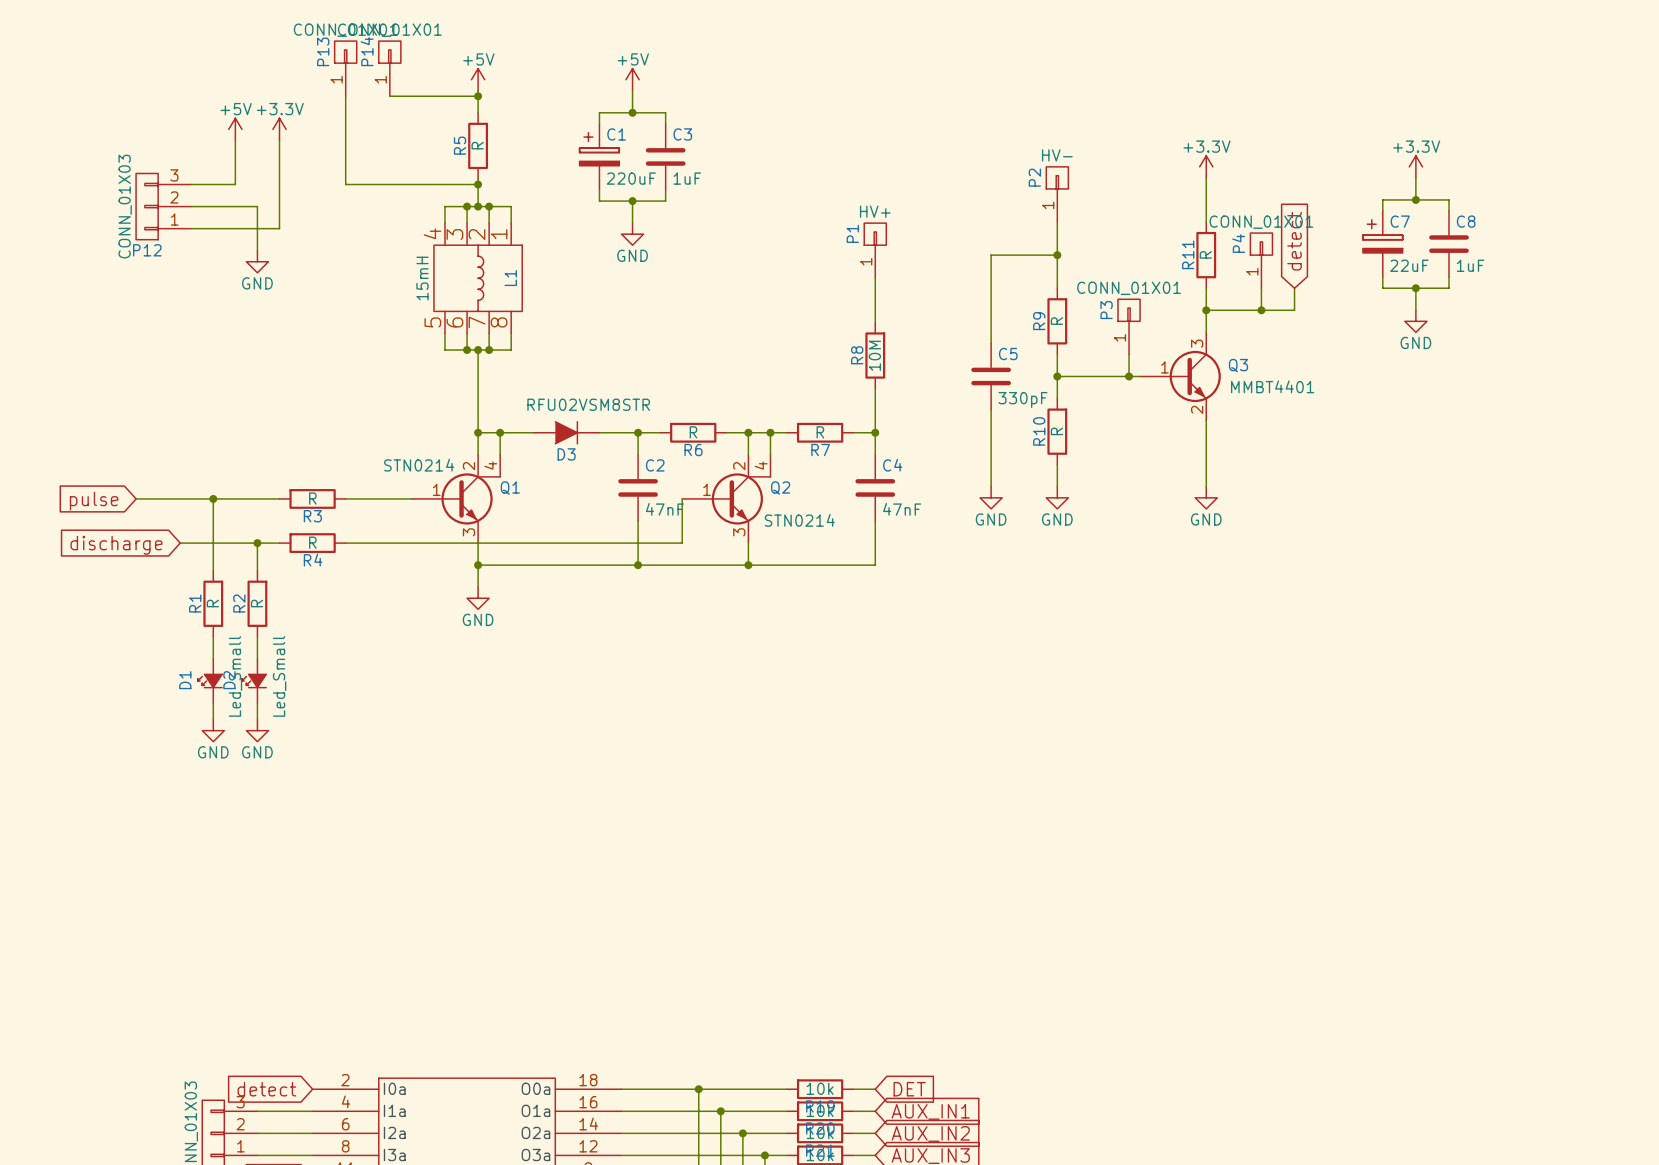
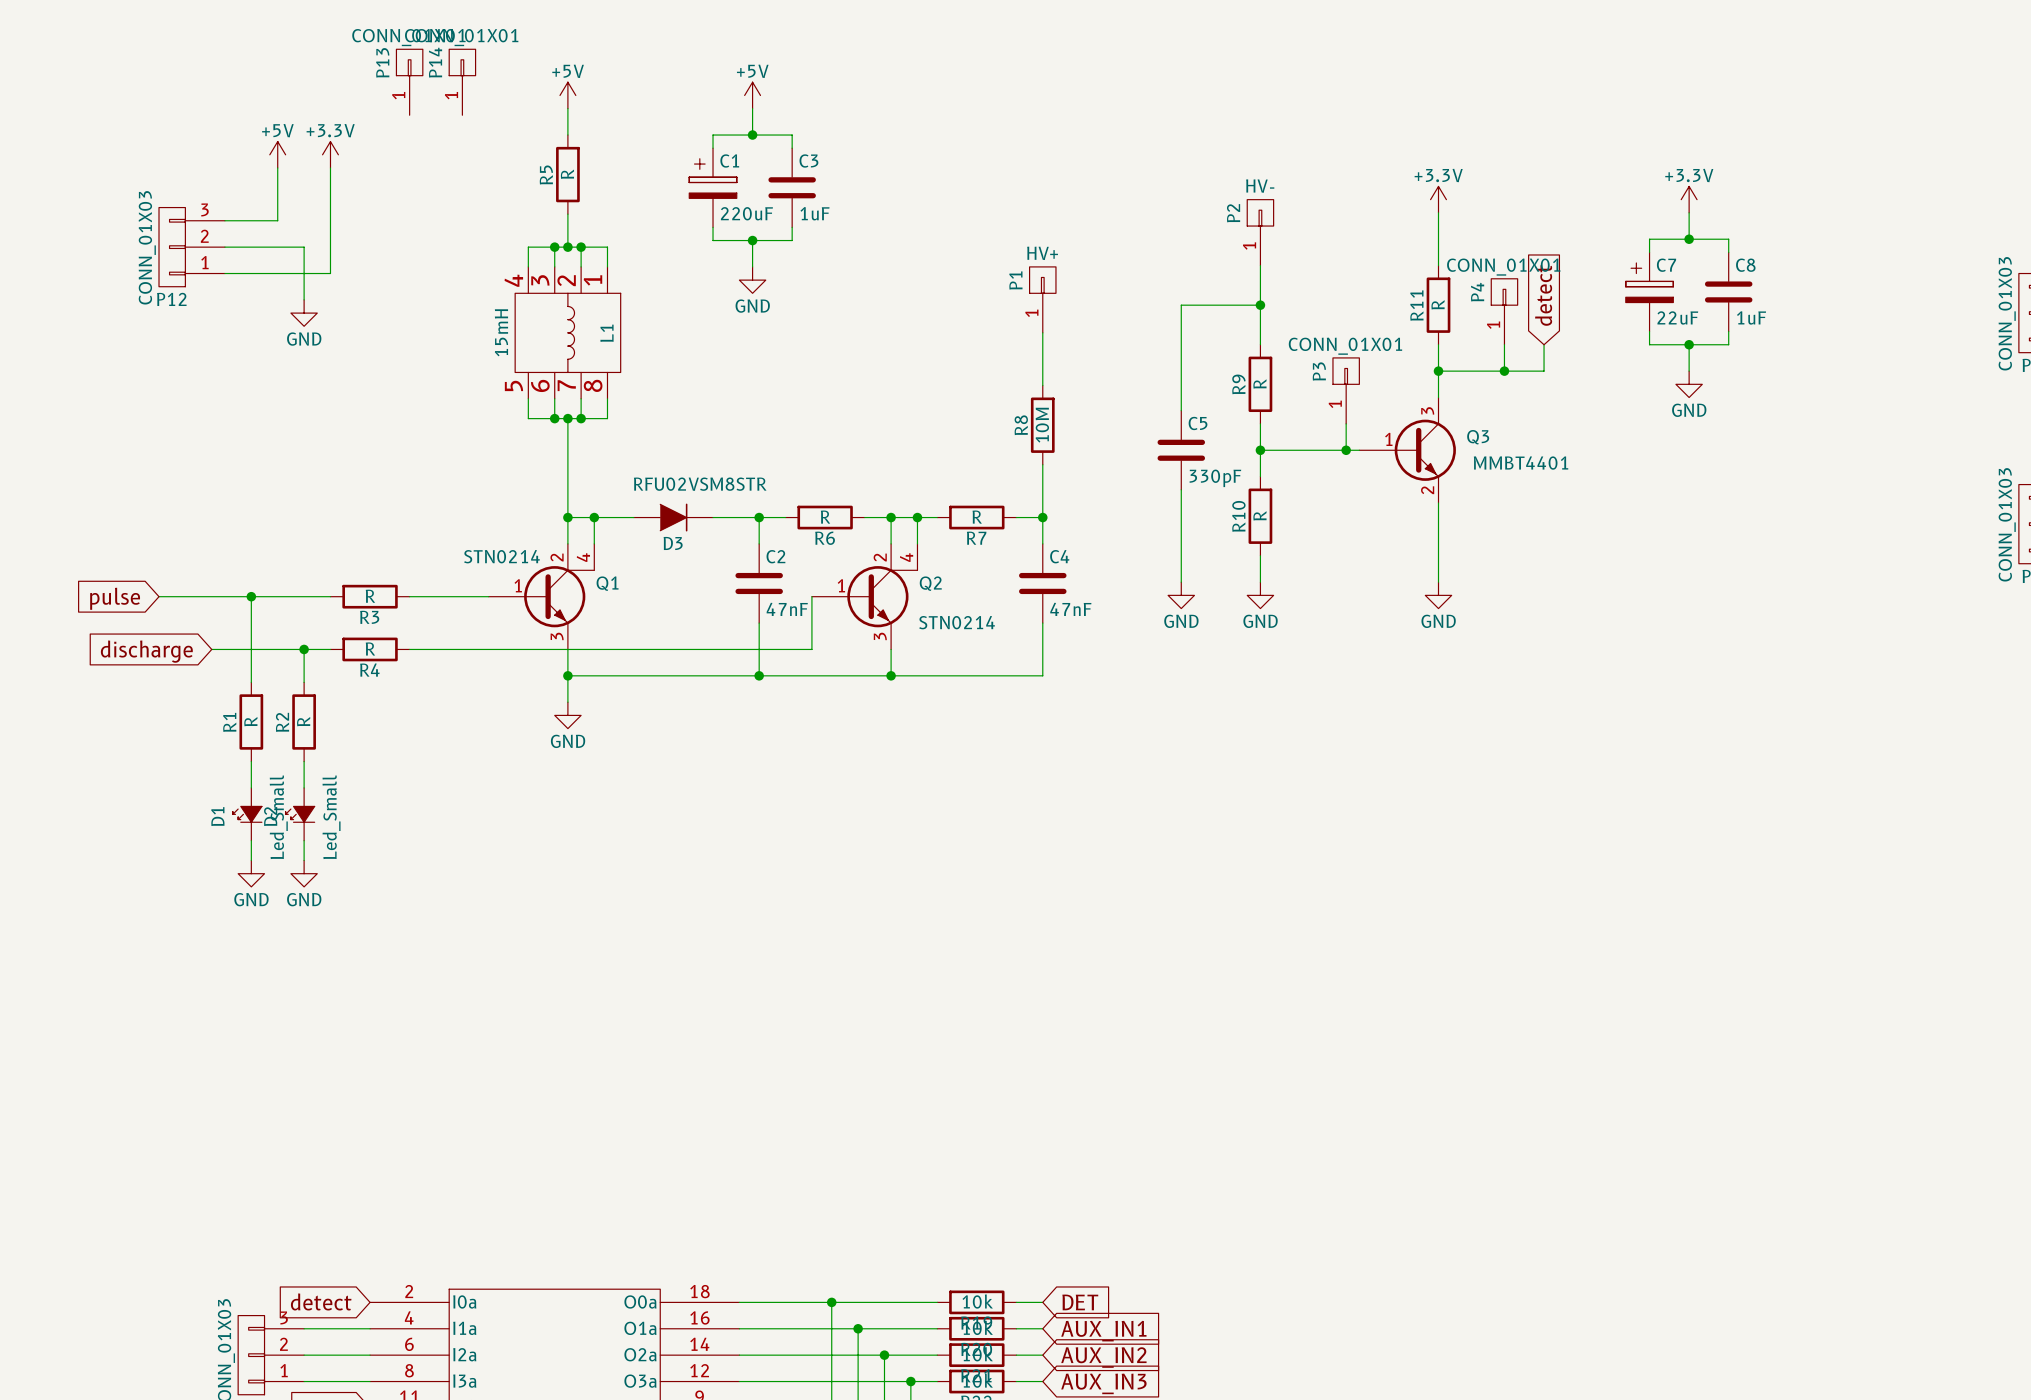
wire: (345, 96) (345, 184) (478, 184) -> none
wire: (389, 96) (478, 96) -> none
junction: (478, 96) -> none
junction: (478, 184) -> none

